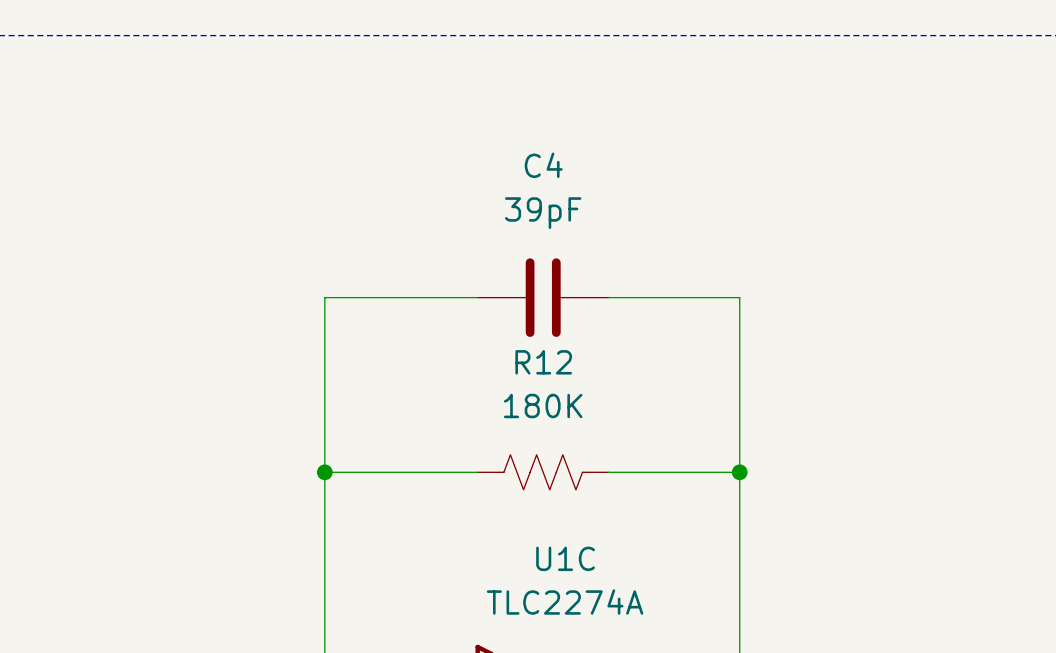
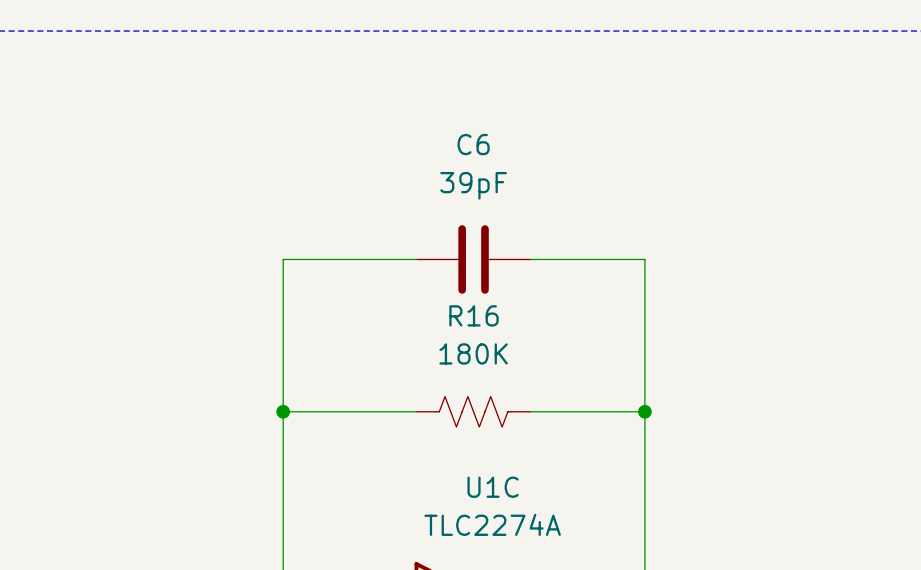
C4 name: C4 (543, 165) -> C6 (473, 144)
R12 name: R12 (543, 362) -> R16 (474, 315)

